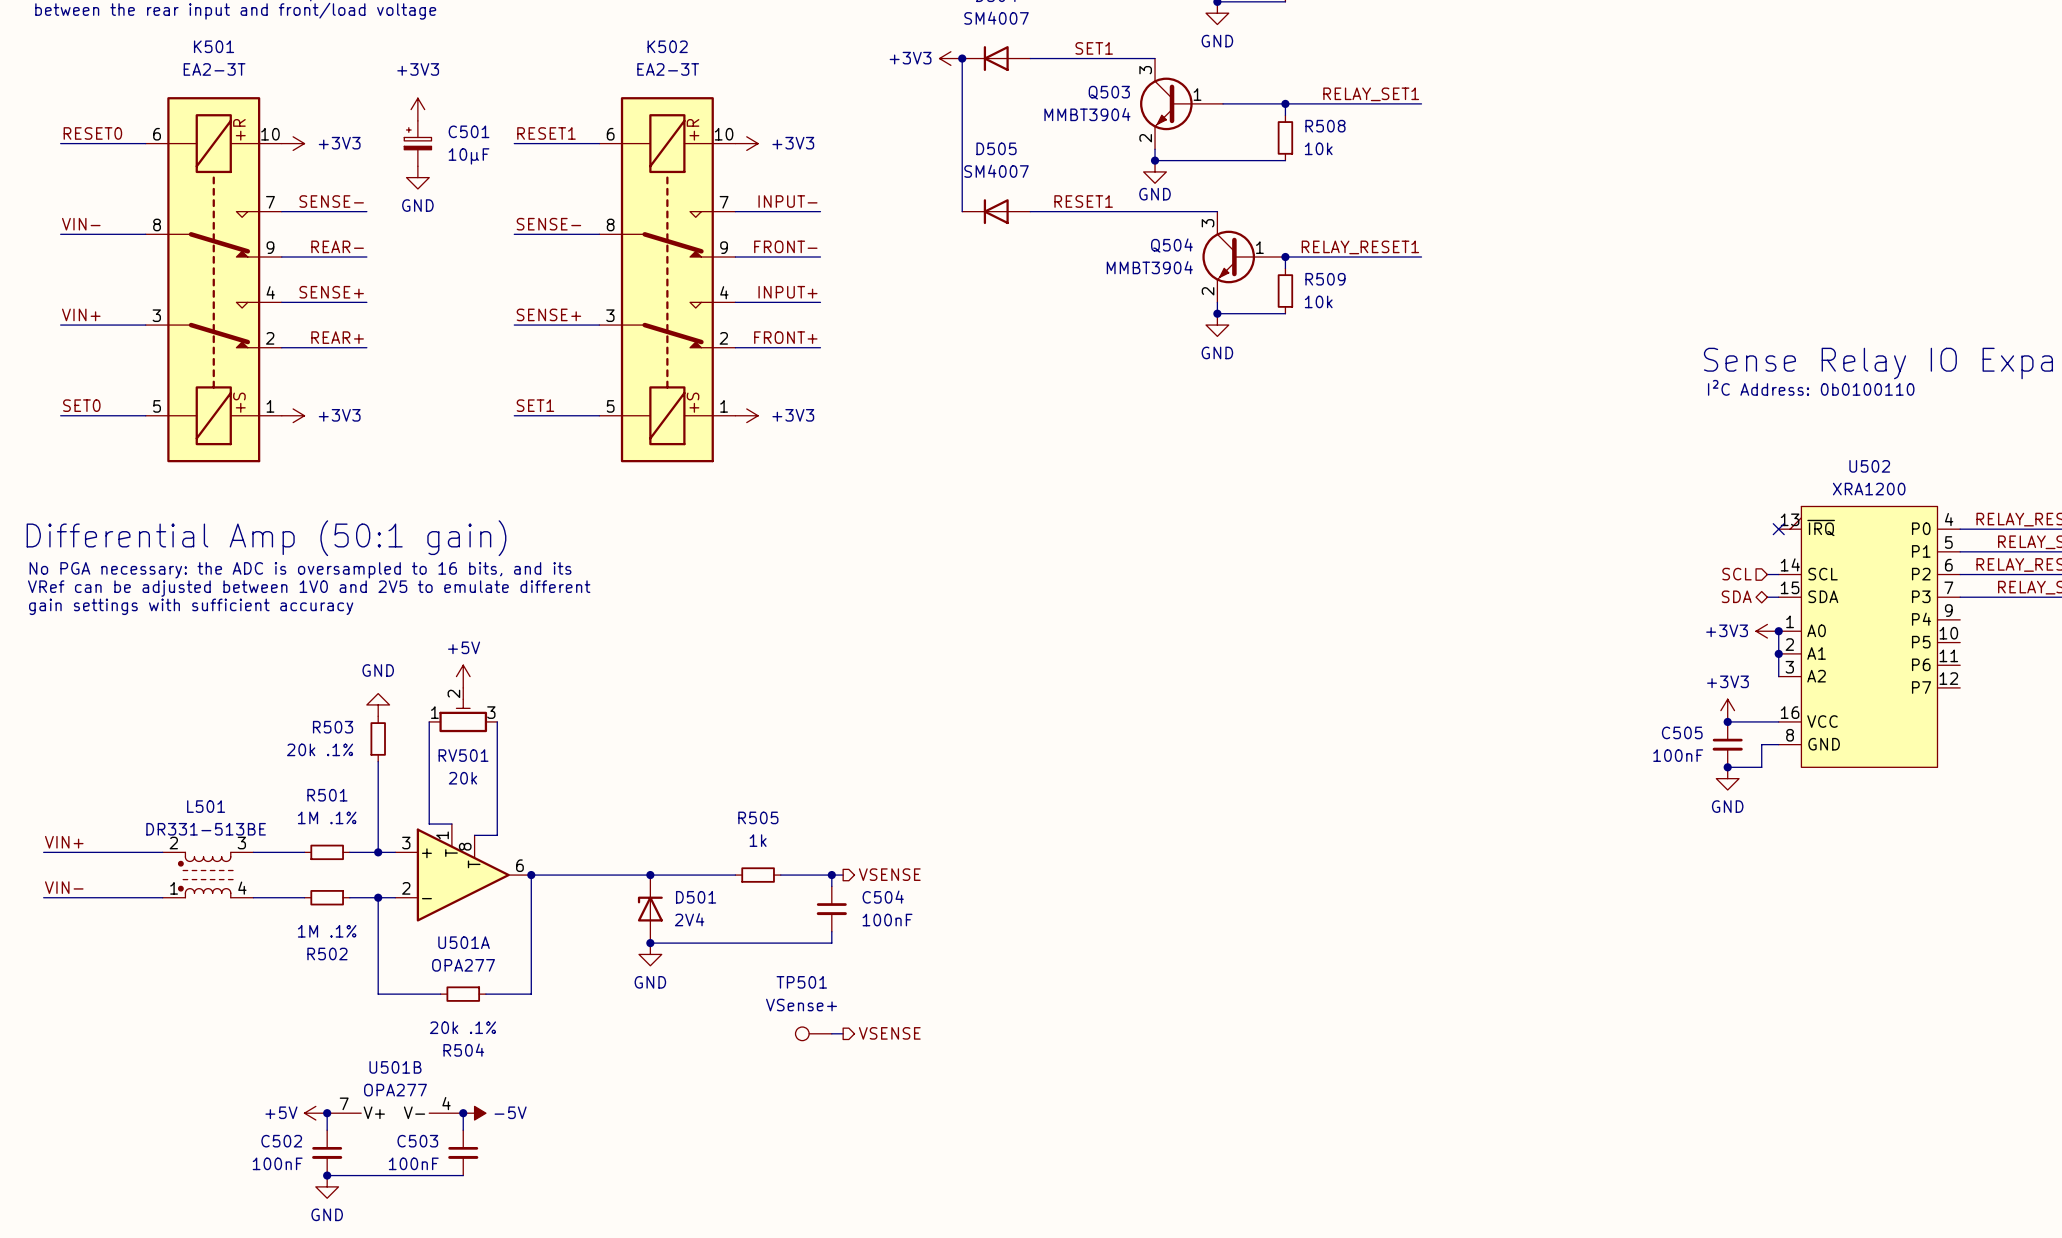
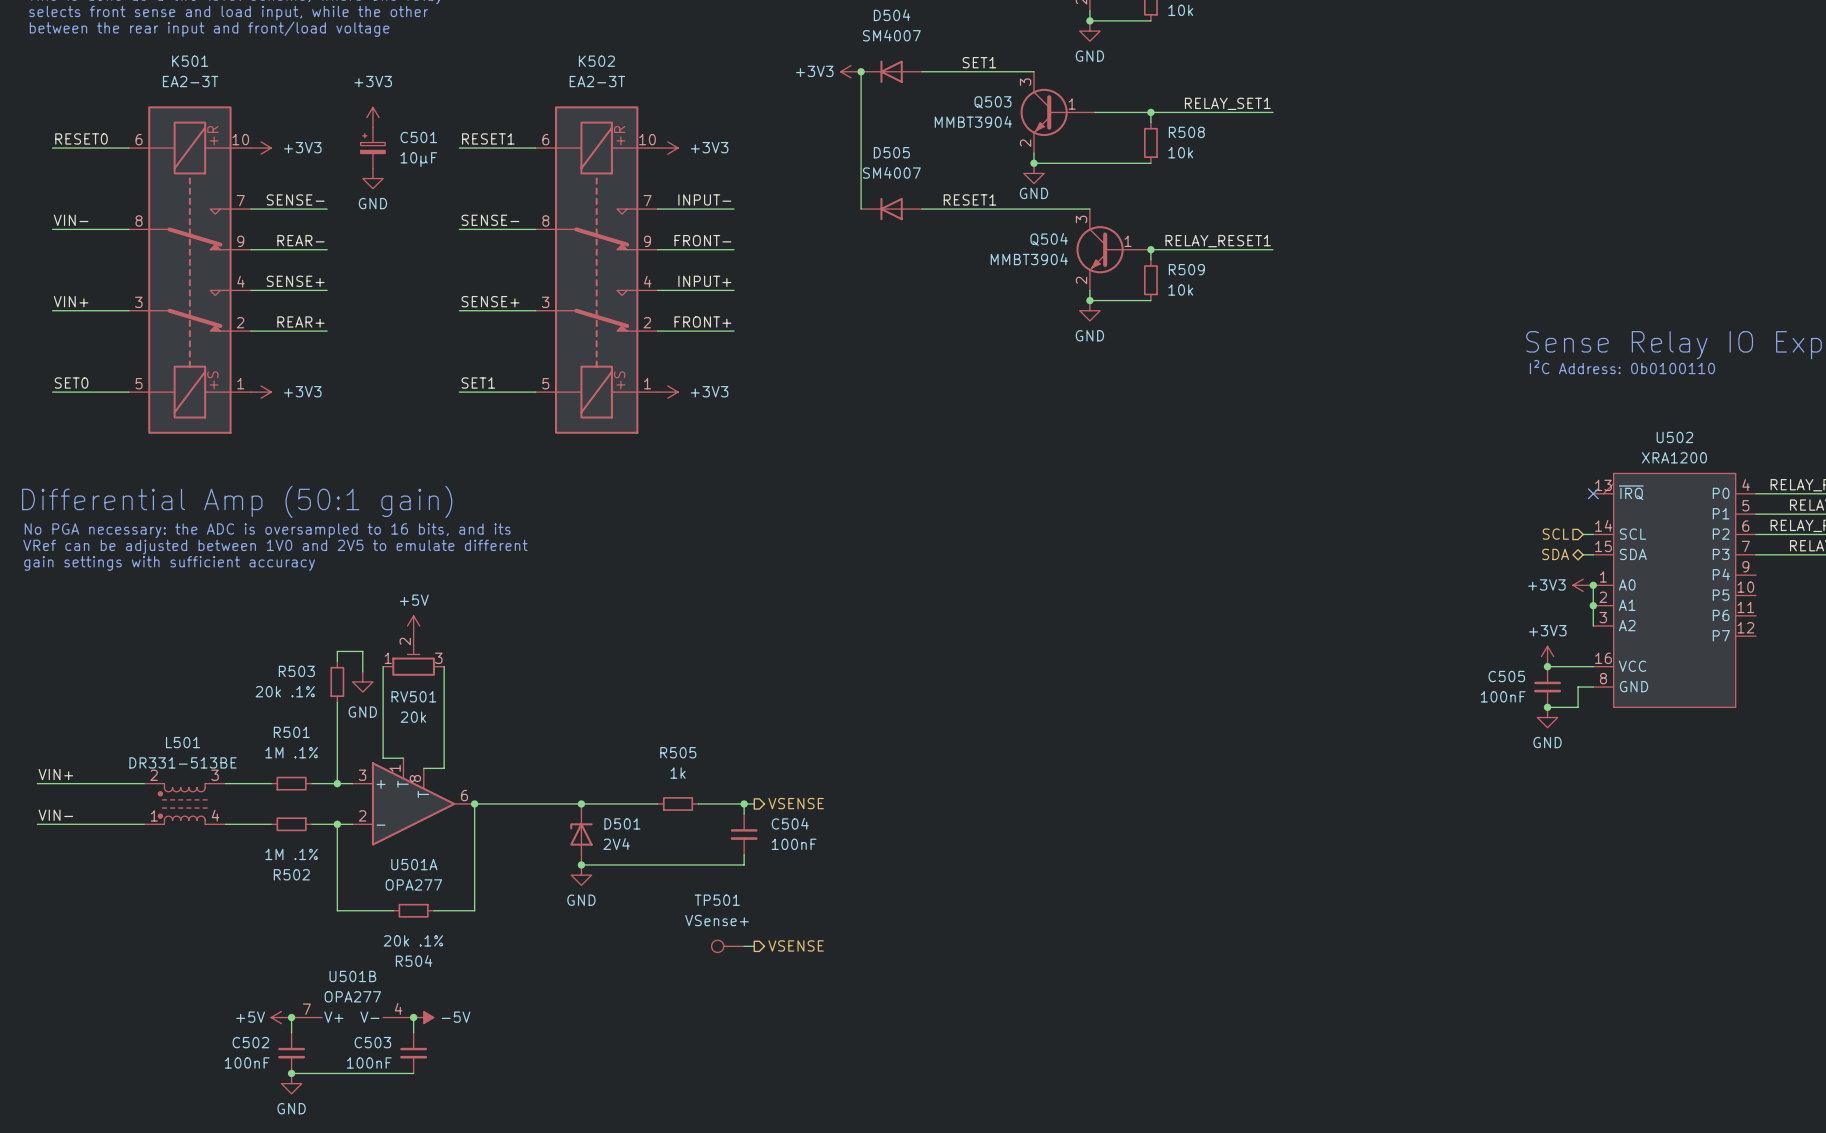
power symbol rotation: 0° (378, 704) -> 180° (362, 681)
power symbol position: GND (378, 704) -> GND (362, 681)
wire: none -> (337, 661) (337, 651) (362, 651) (362, 671)

